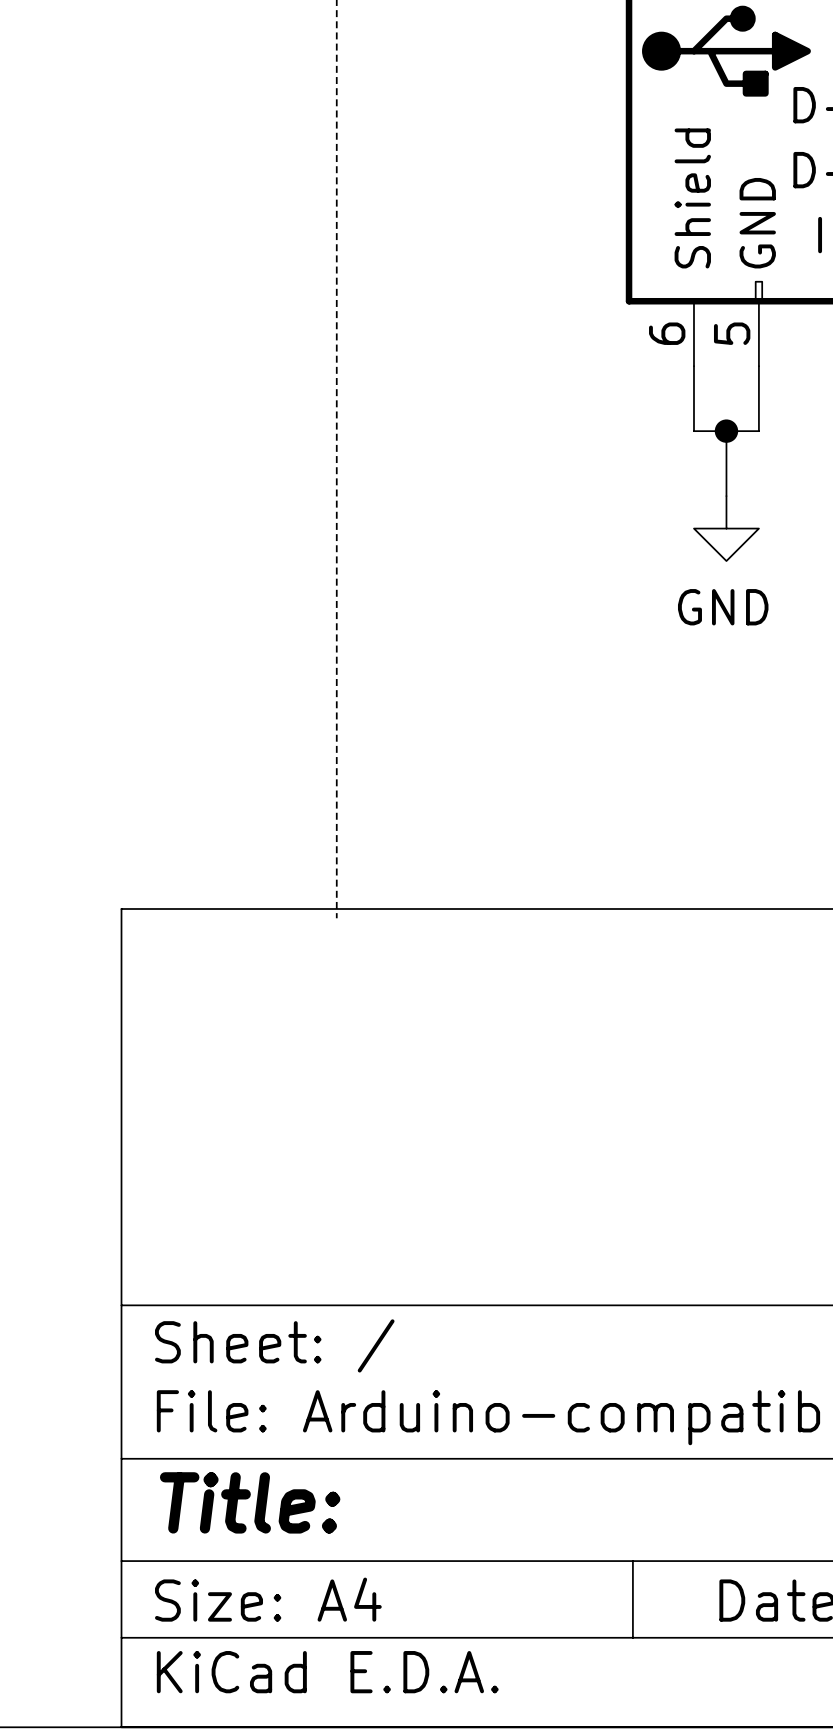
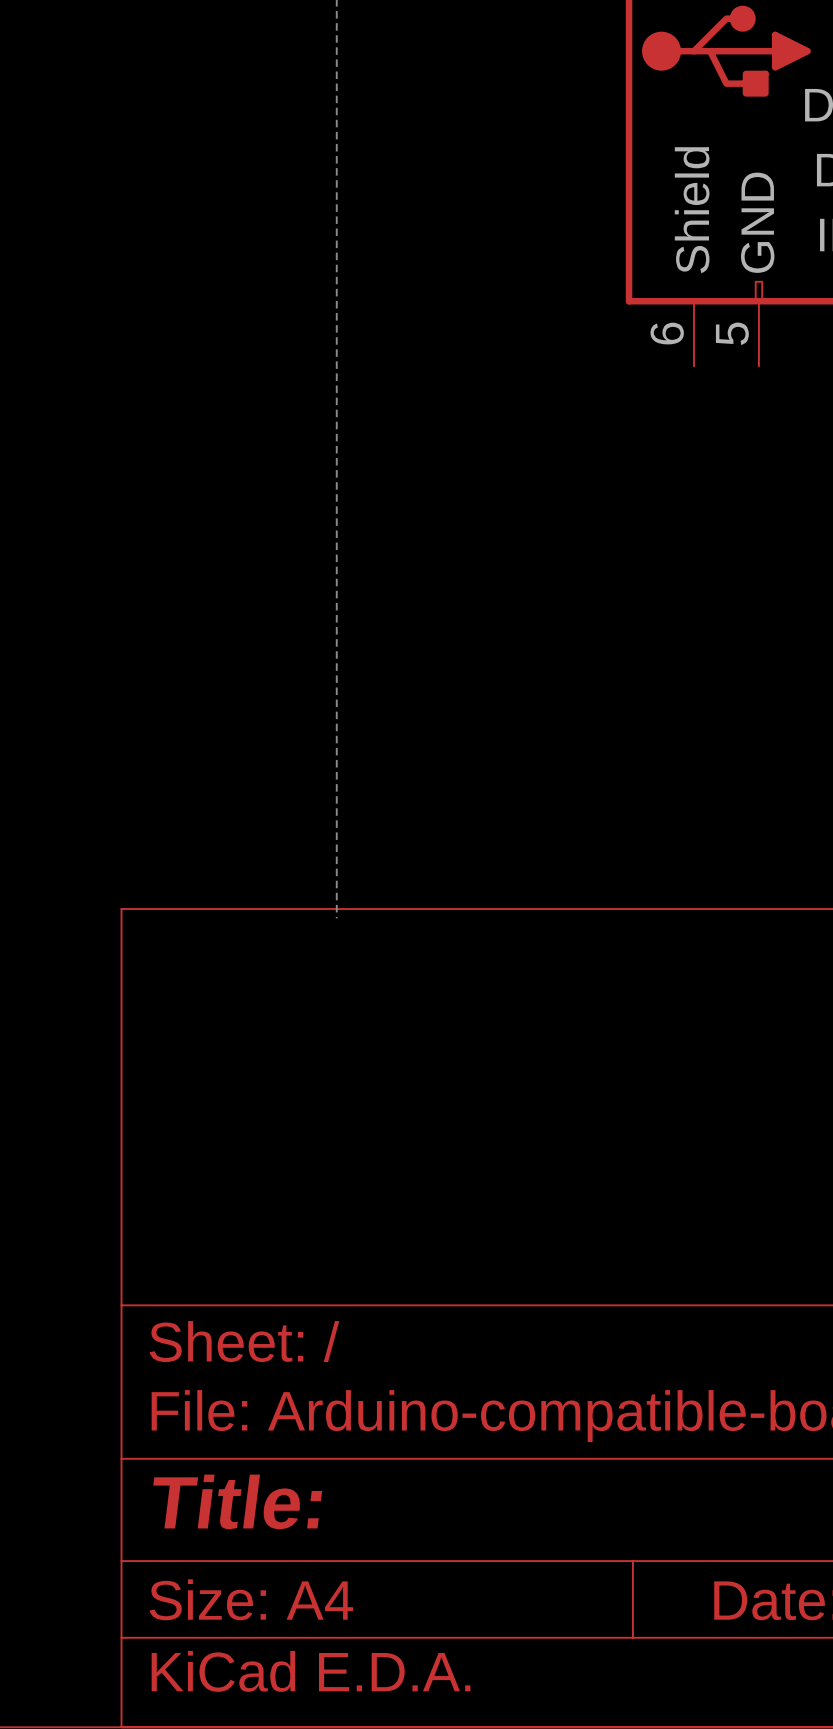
wire: (693, 366) (693, 431) (758, 431) (758, 366) -> none
wire: (726, 431) (726, 496) -> none
junction: (726, 431) -> none
power symbol: GND (726, 528) -> none

